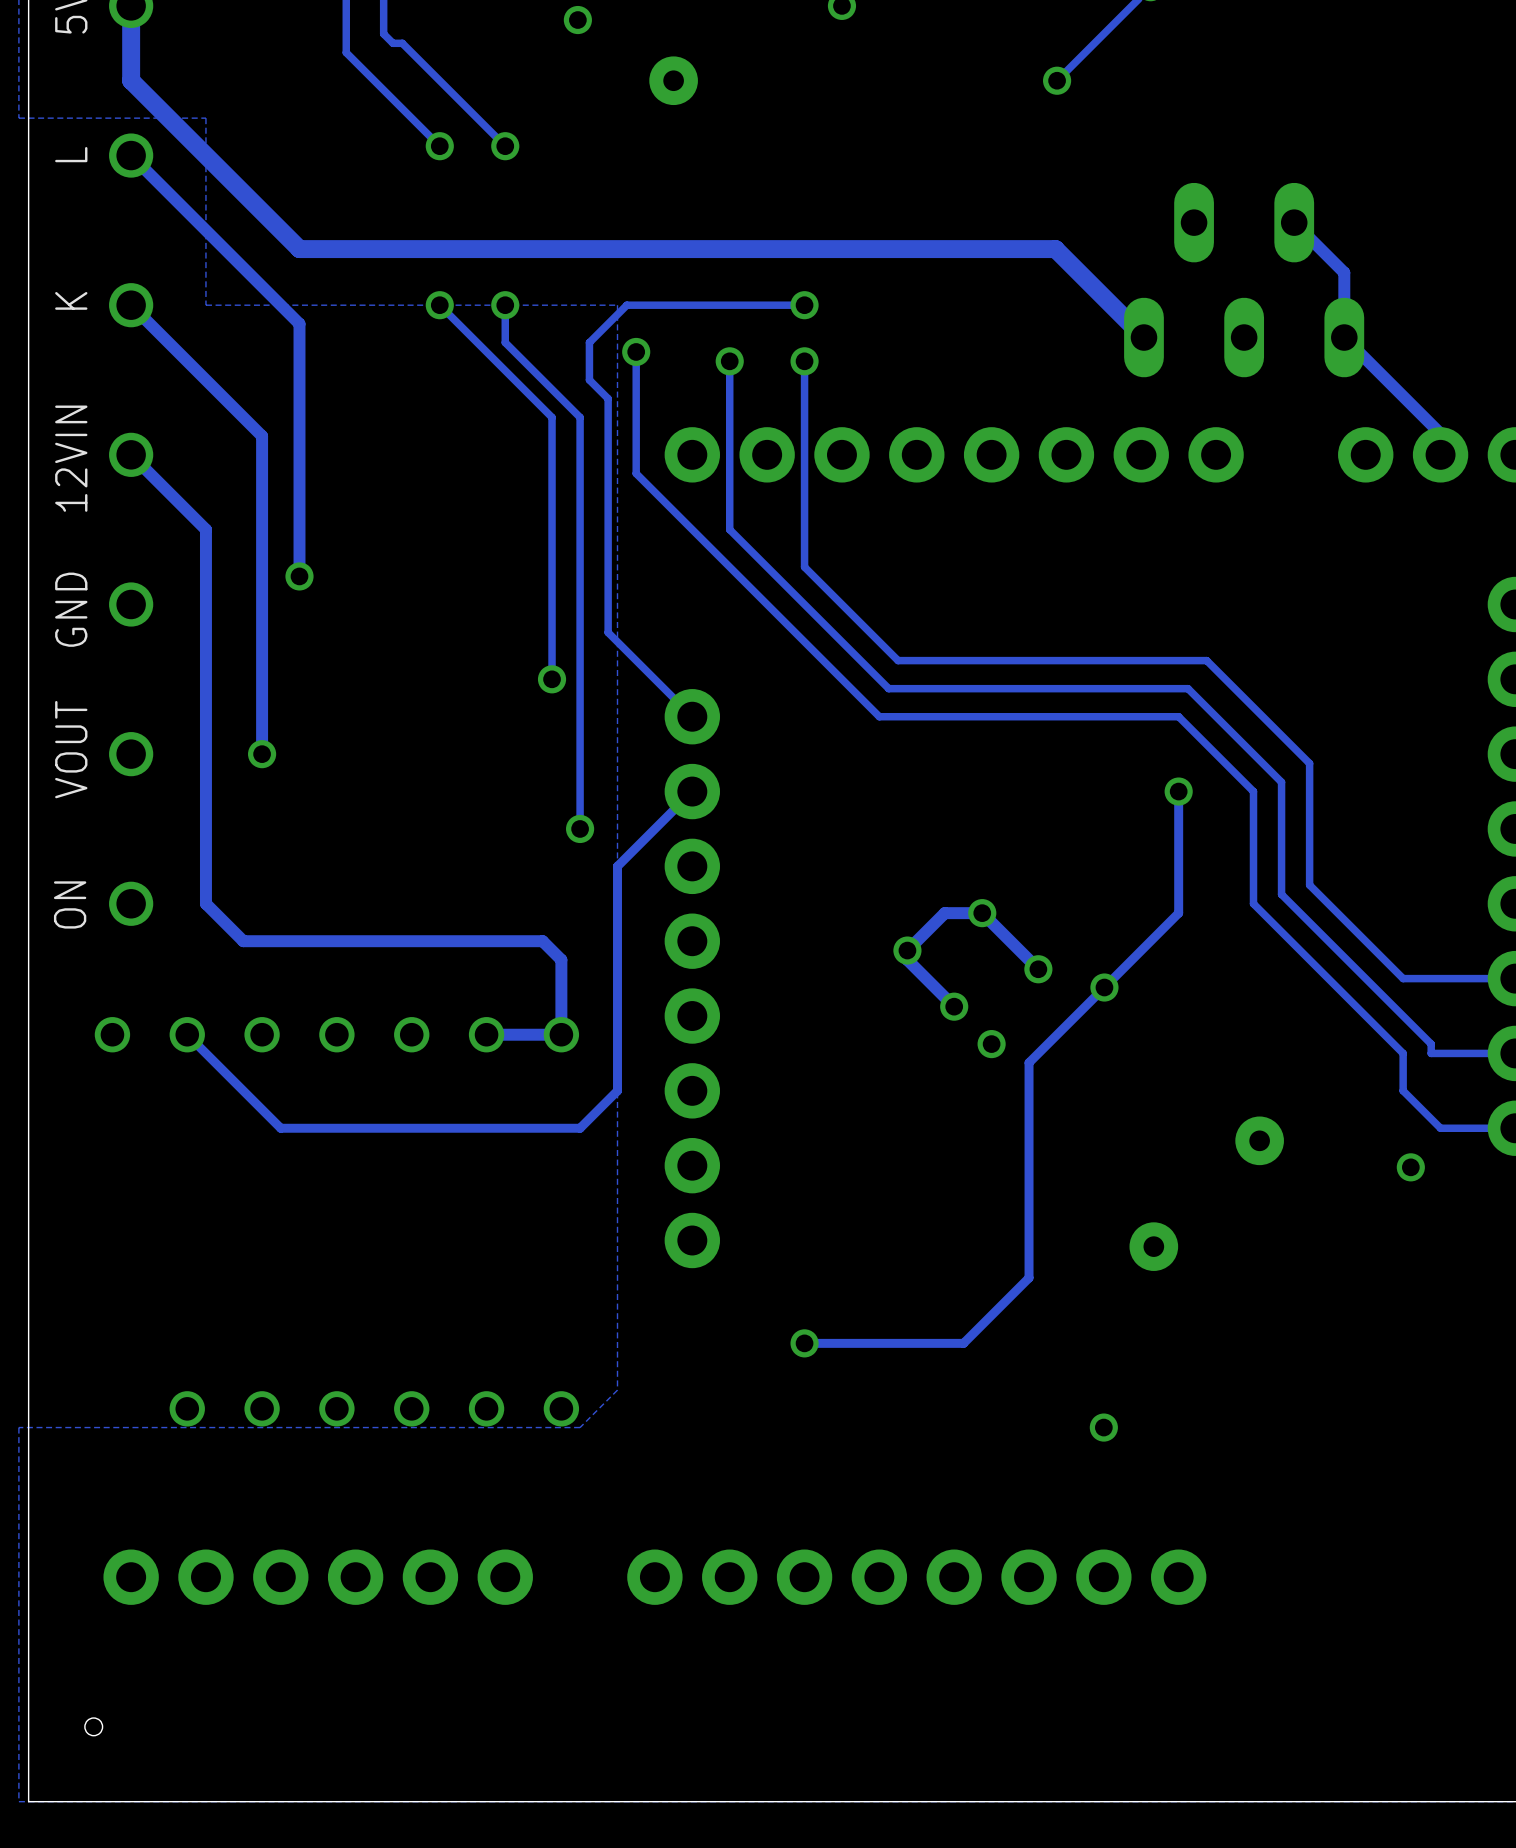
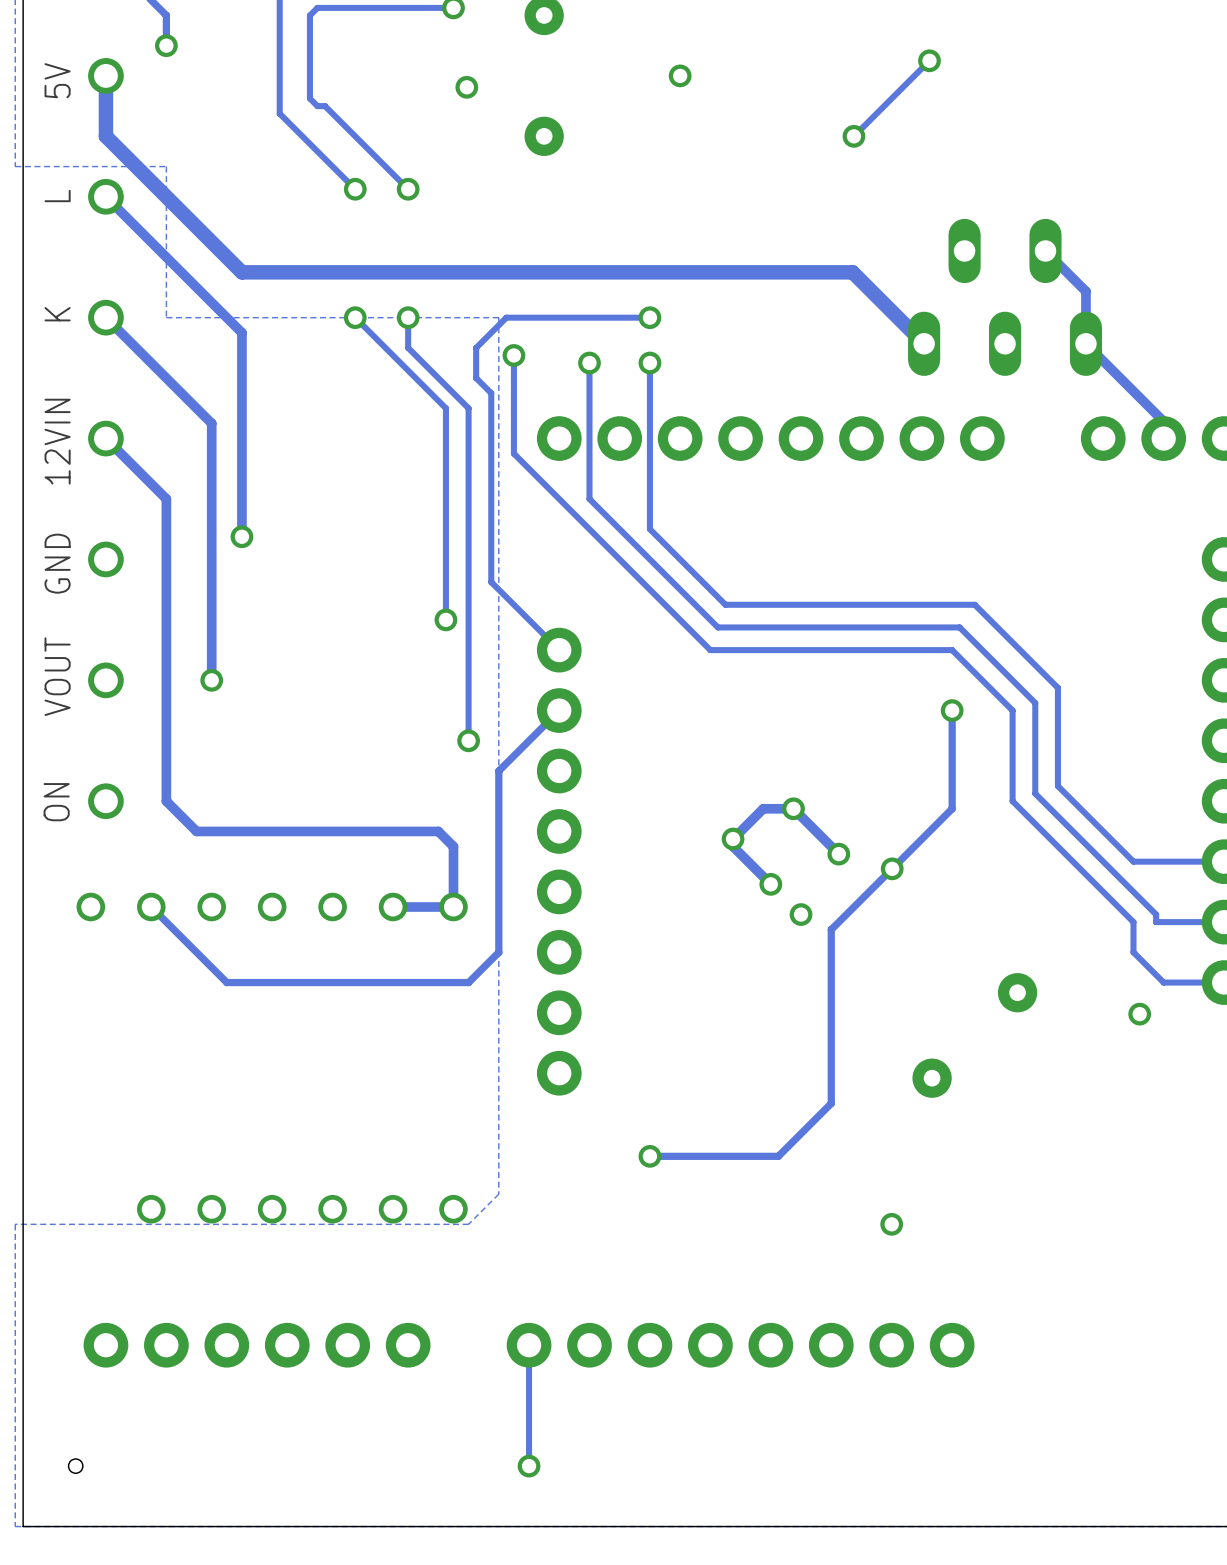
track: none -> (529, 1345) (529, 1466)
via: none -> (529, 1466)

